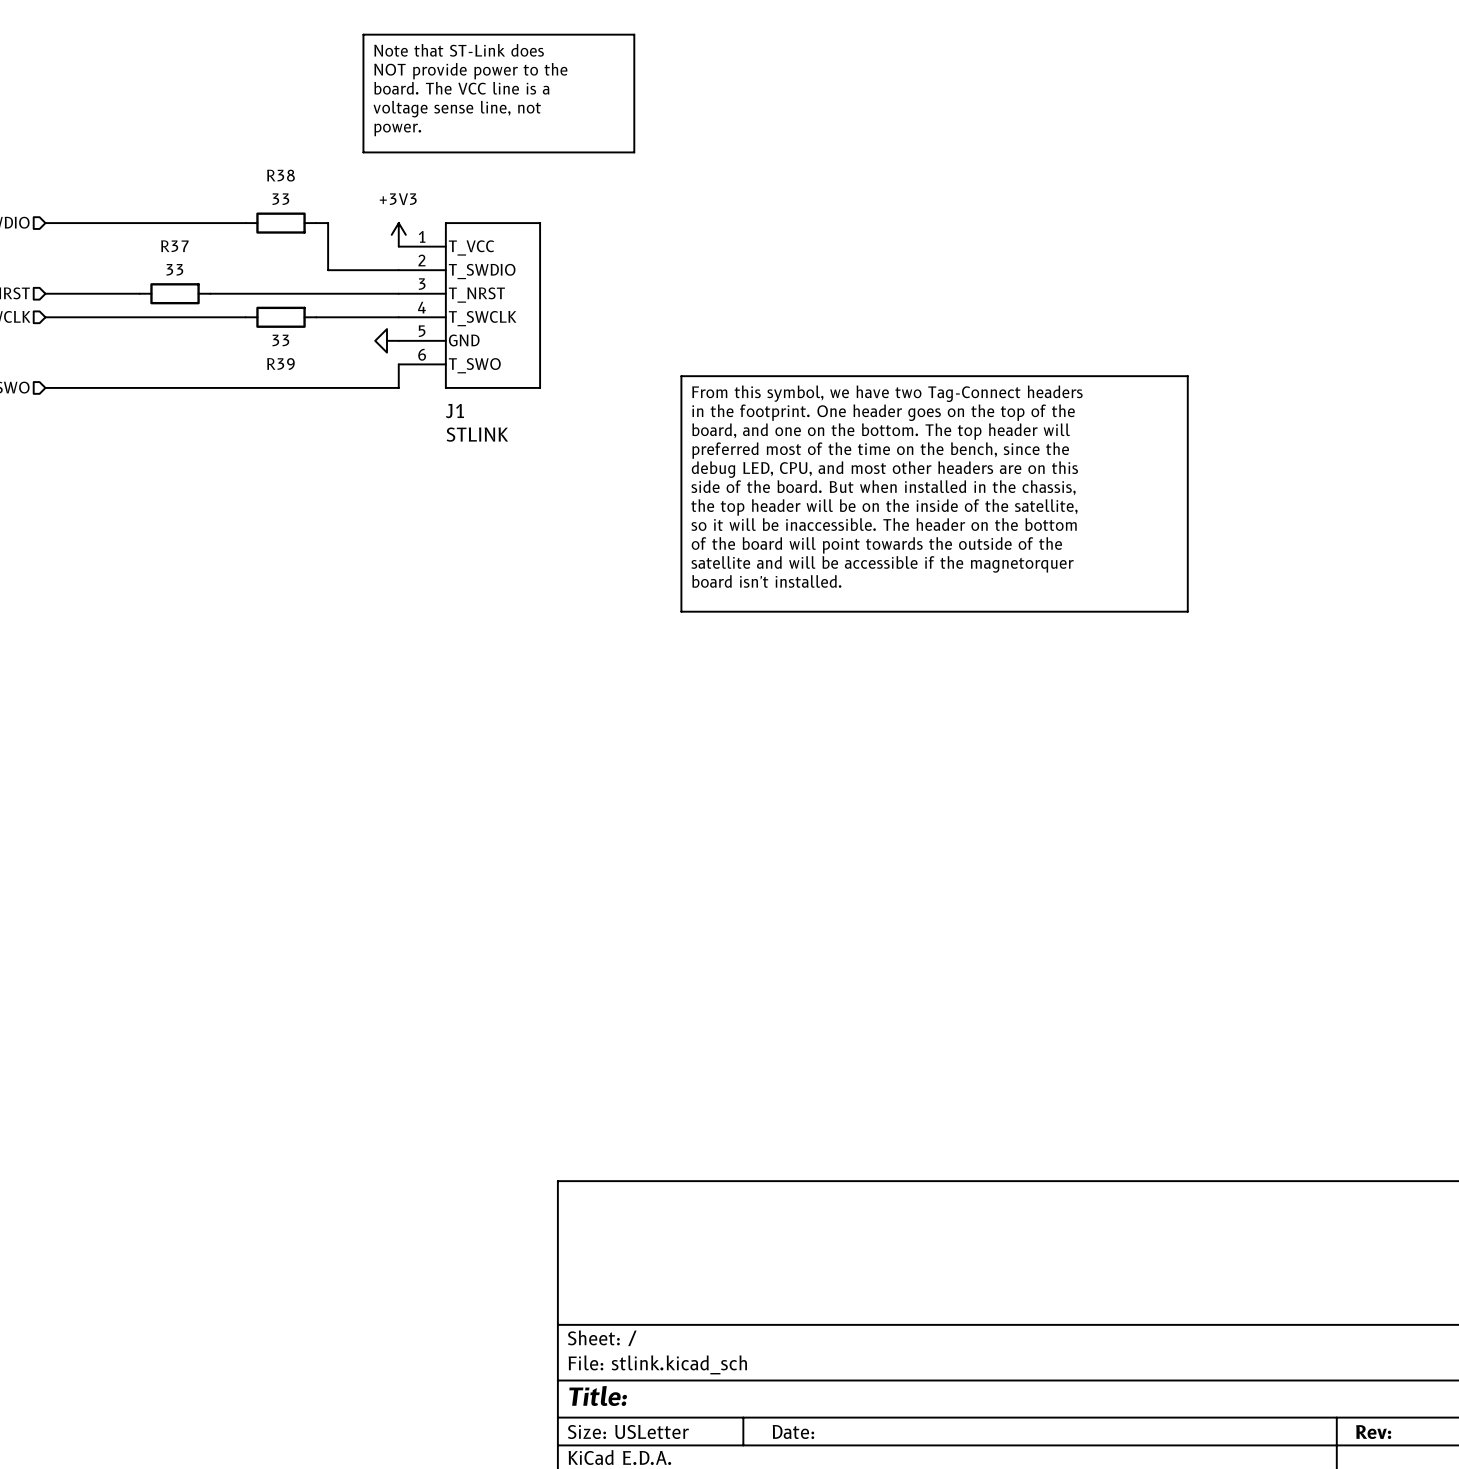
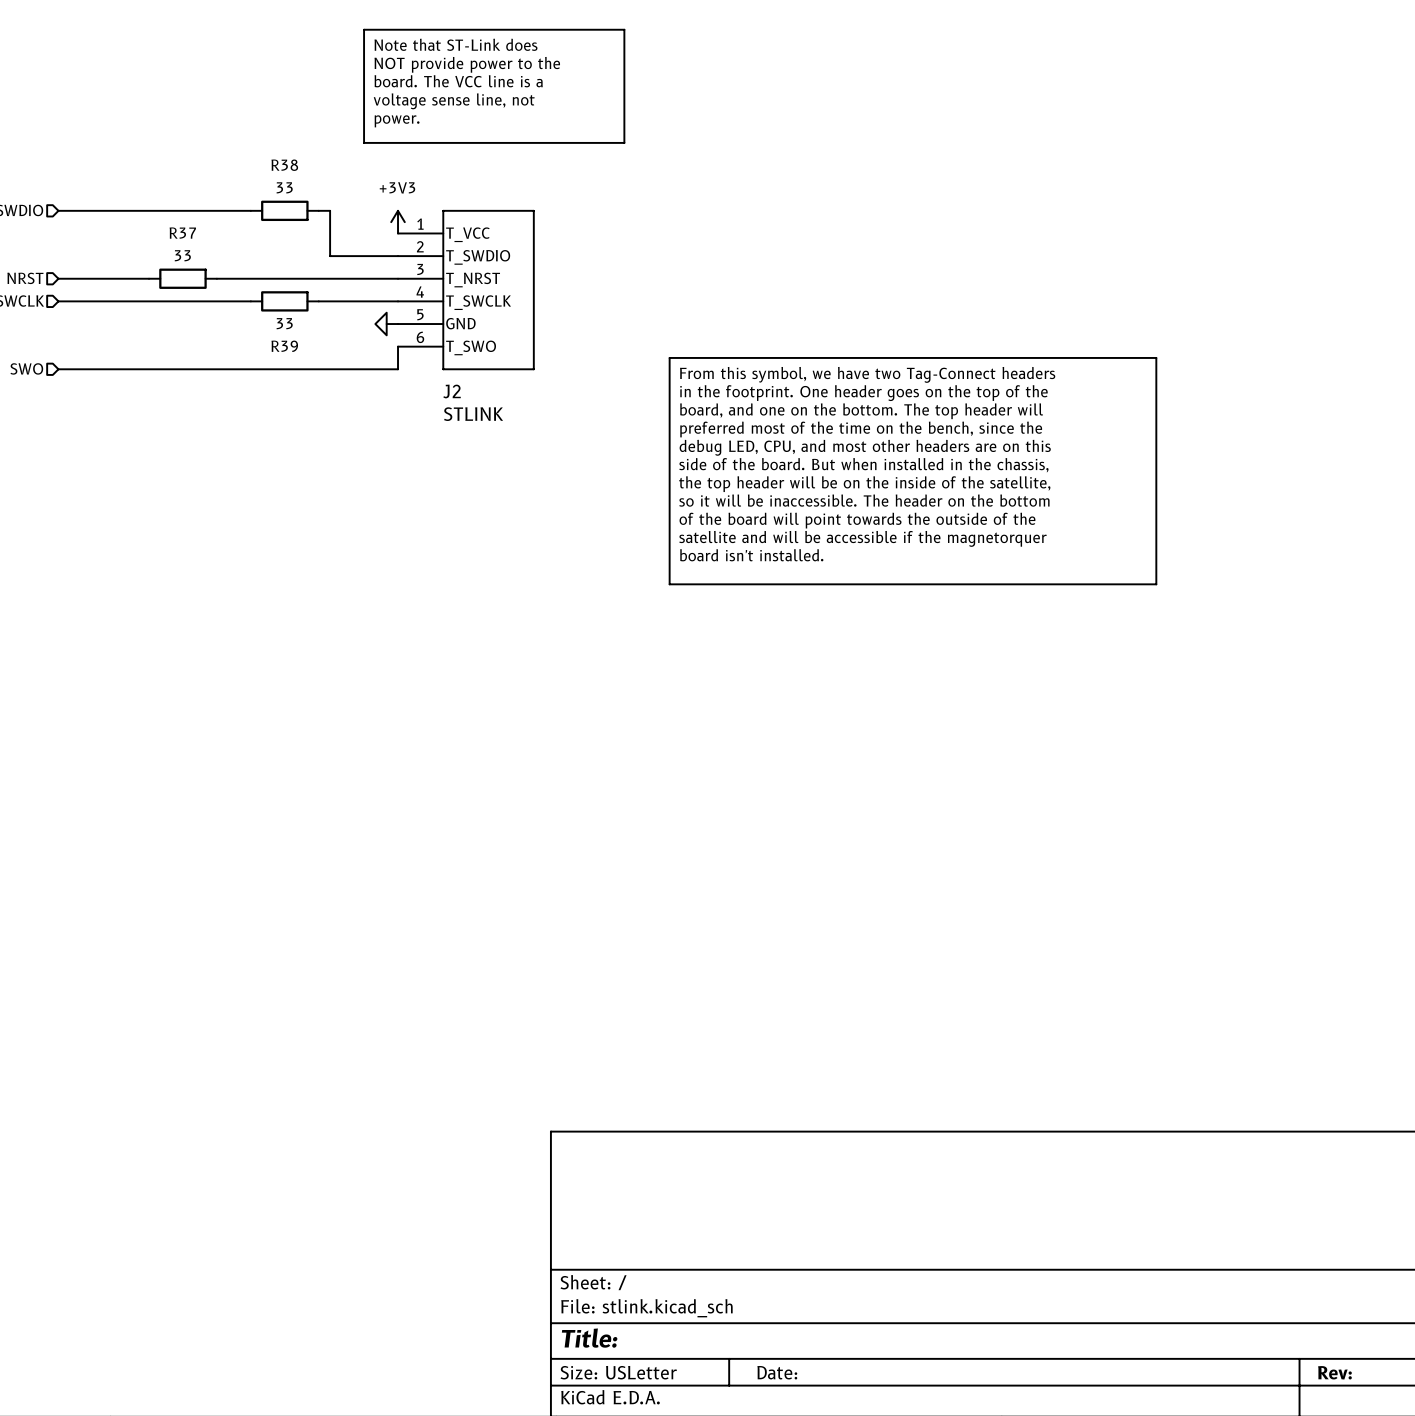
J1 name: J1 (454, 411) -> J2 (452, 391)

